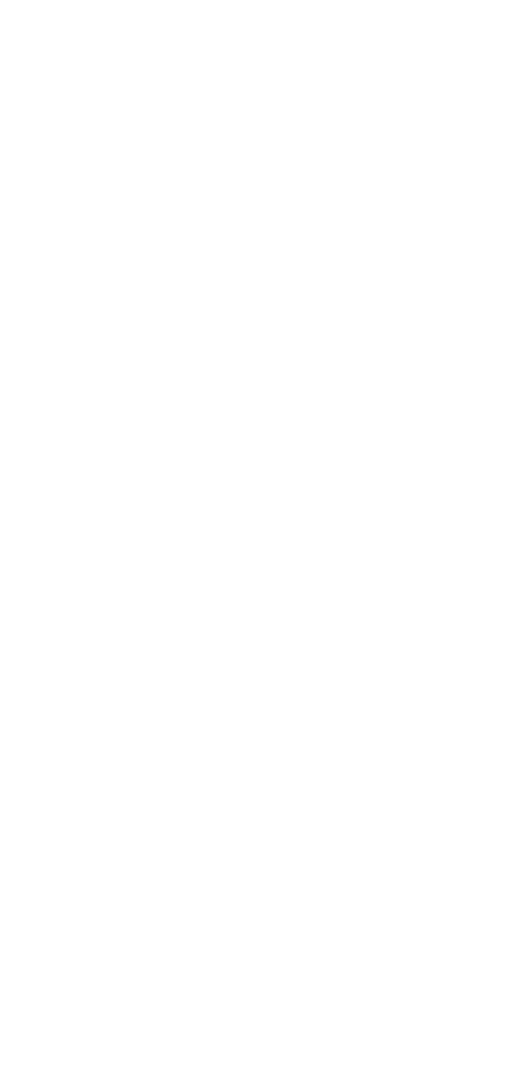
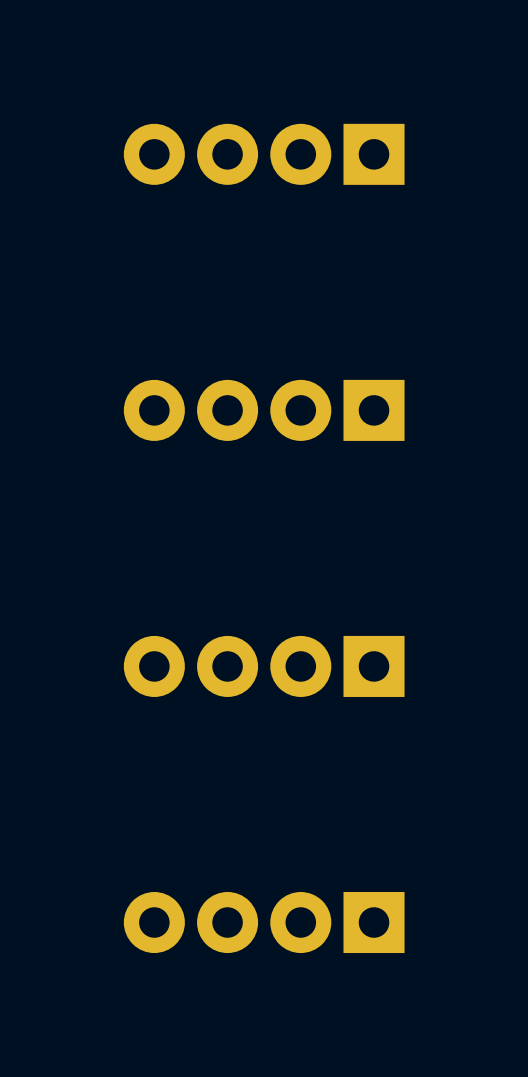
part: none -> (264, 154)
part: none -> (264, 410)
part: none -> (264, 666)
part: none -> (264, 922)

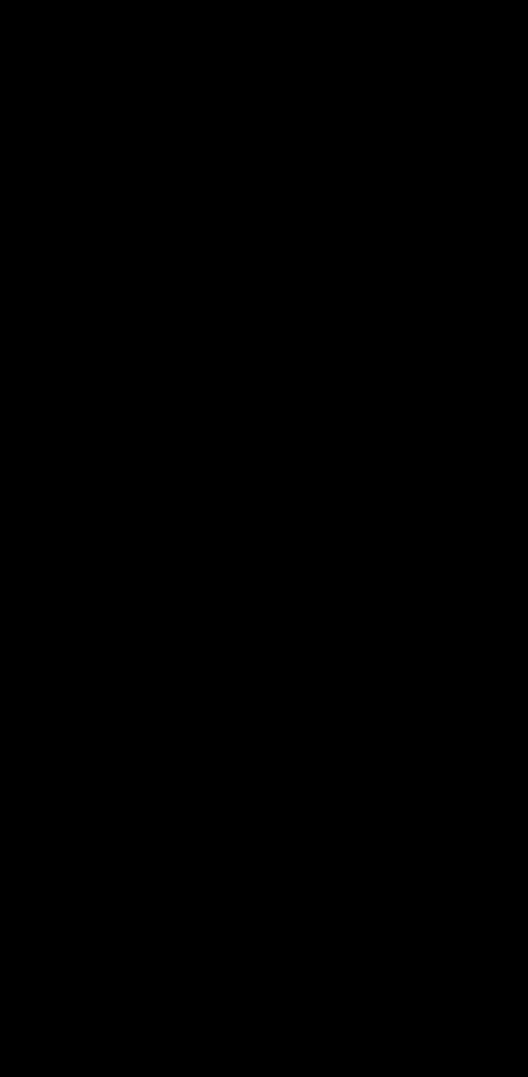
part: (264, 154) -> none
part: (264, 410) -> none
part: (264, 666) -> none
part: (264, 922) -> none

